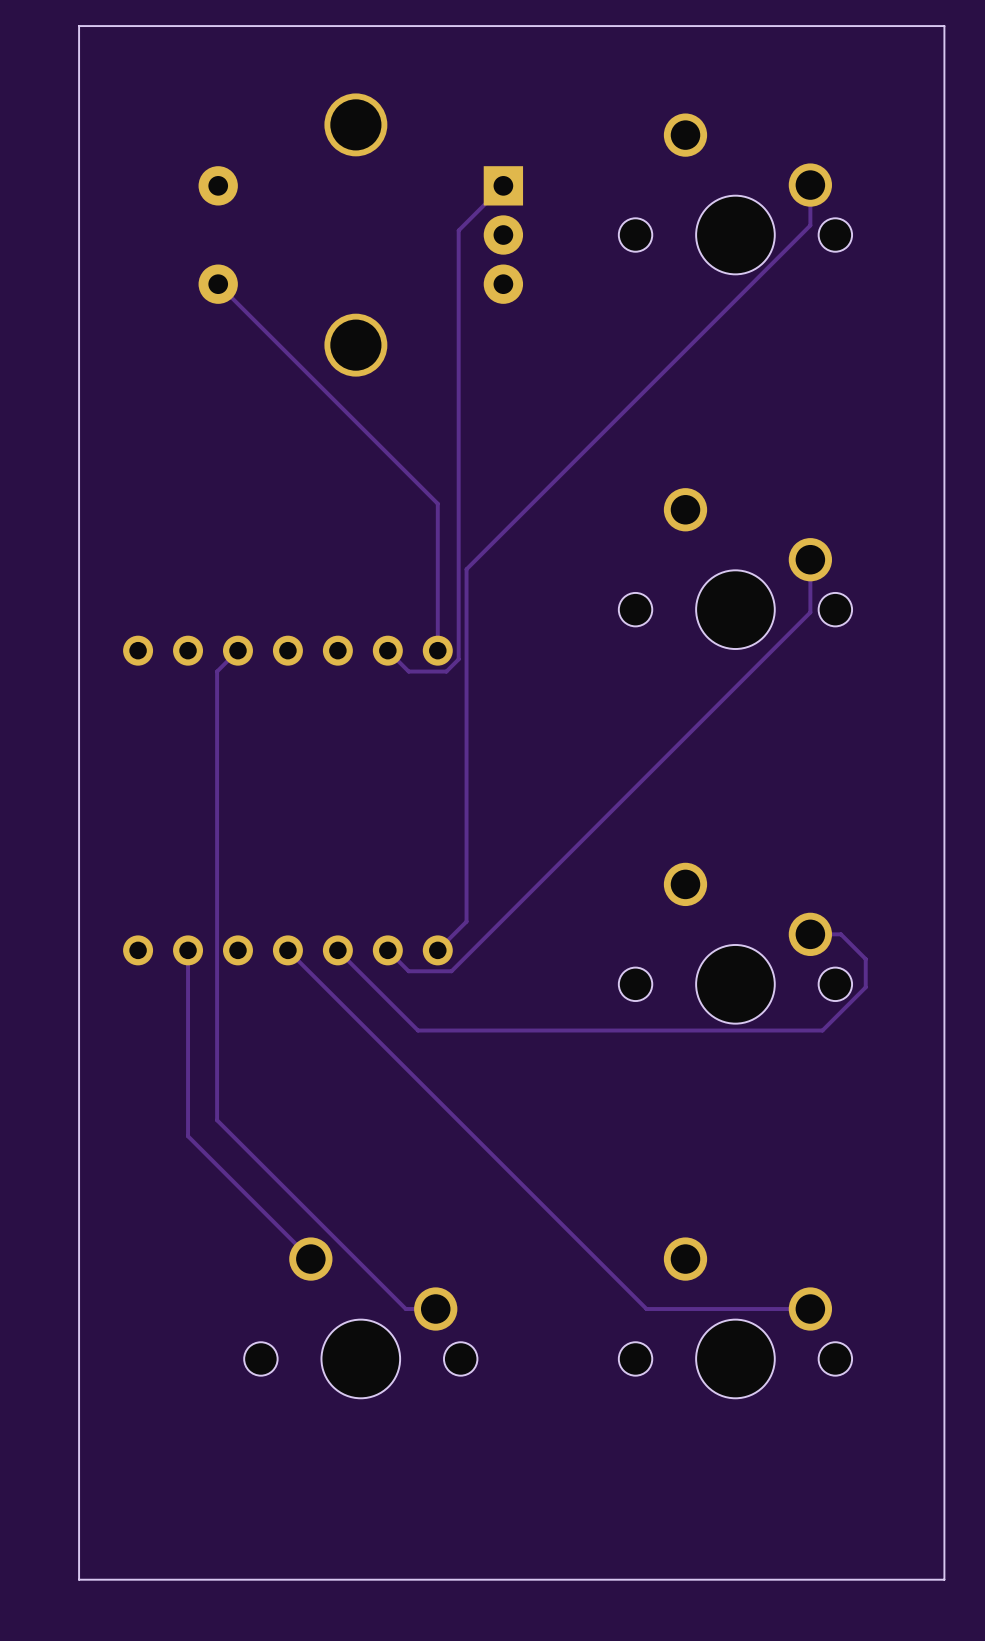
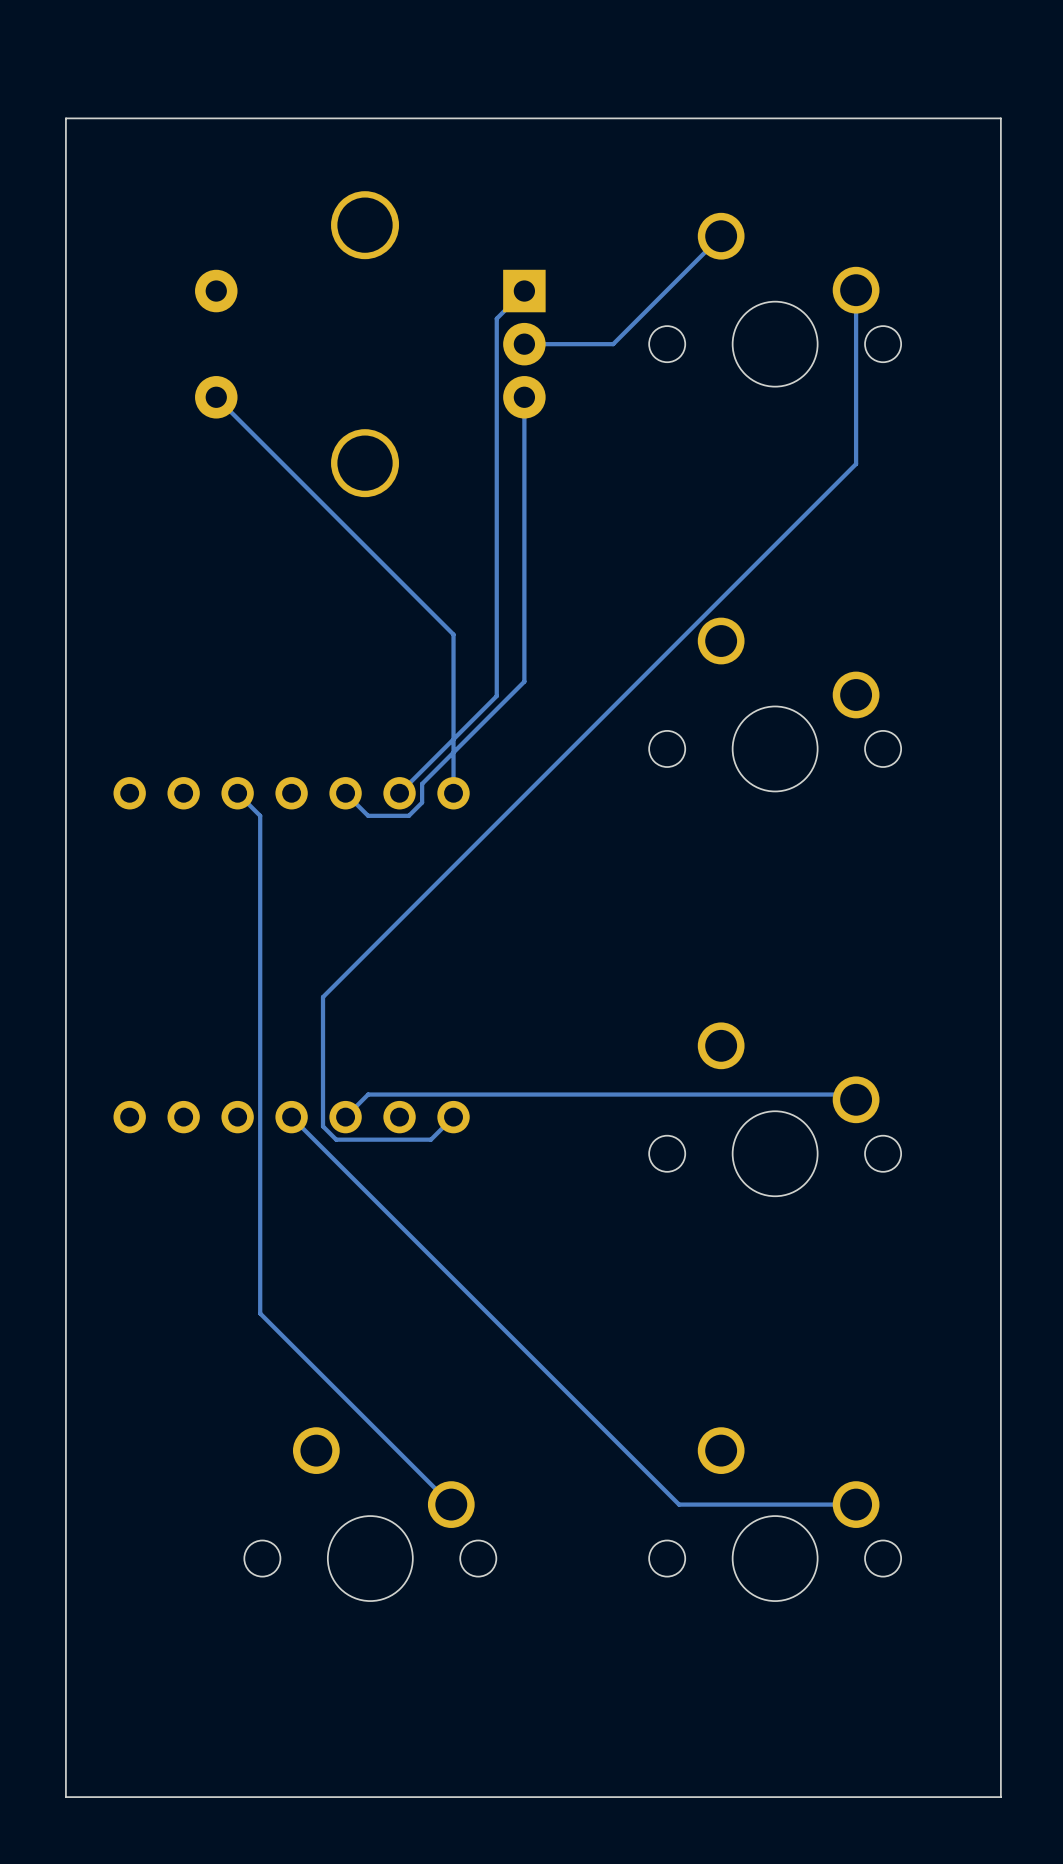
track: none -> (721, 236) (613, 344) (524, 344)
track: (477, 211) (458, 230) (458, 659) (446, 671) (408, 671) (387, 650) -> (496, 318) (496, 696) (399, 793)
track: (810, 225) (466, 569) (466, 921) (437, 950) -> (856, 333) (856, 464) (323, 997) (323, 1126) (336, 1139) (422, 1139)
track: none -> (524, 397) (524, 681) (422, 783) (422, 802) (408, 815) (368, 815) (345, 793)
track: (810, 559) (810, 612) (451, 971) (416, 971) -> (453, 1117) (430, 1139)
track: (237, 650) (217, 671) (217, 1120) (405, 1309) (435, 1309) -> (237, 793) (260, 815) (260, 1313) (451, 1504)
track: (810, 934) (840, 934) (865, 959) (865, 987) (822, 1030) (418, 1030) (337, 950) -> (856, 1099) (850, 1094) (368, 1094) (345, 1117)
track: (188, 950) (188, 1136) (310, 1259) -> none
track: (387, 950) (408, 971) -> none

